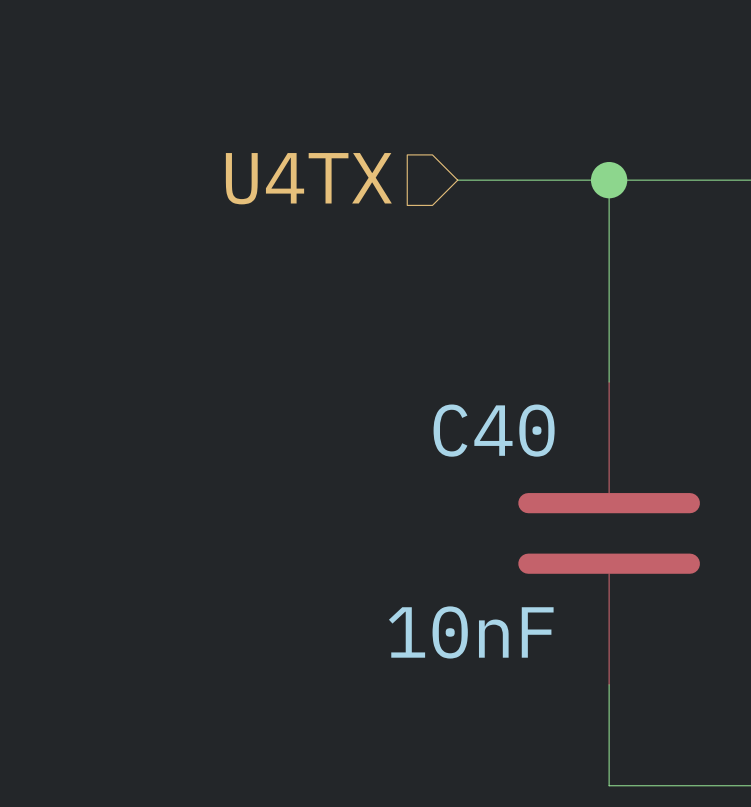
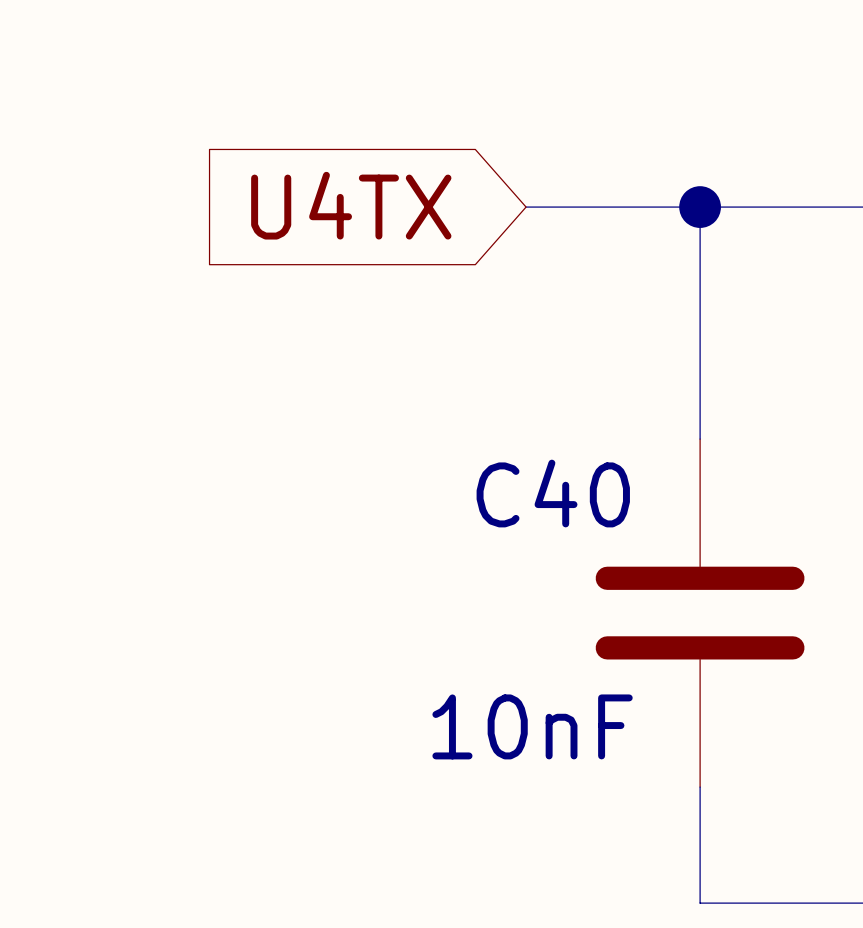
hierarchical label: U4TX (308, 178) -> none
global label: none -> U4TX (351, 205)

